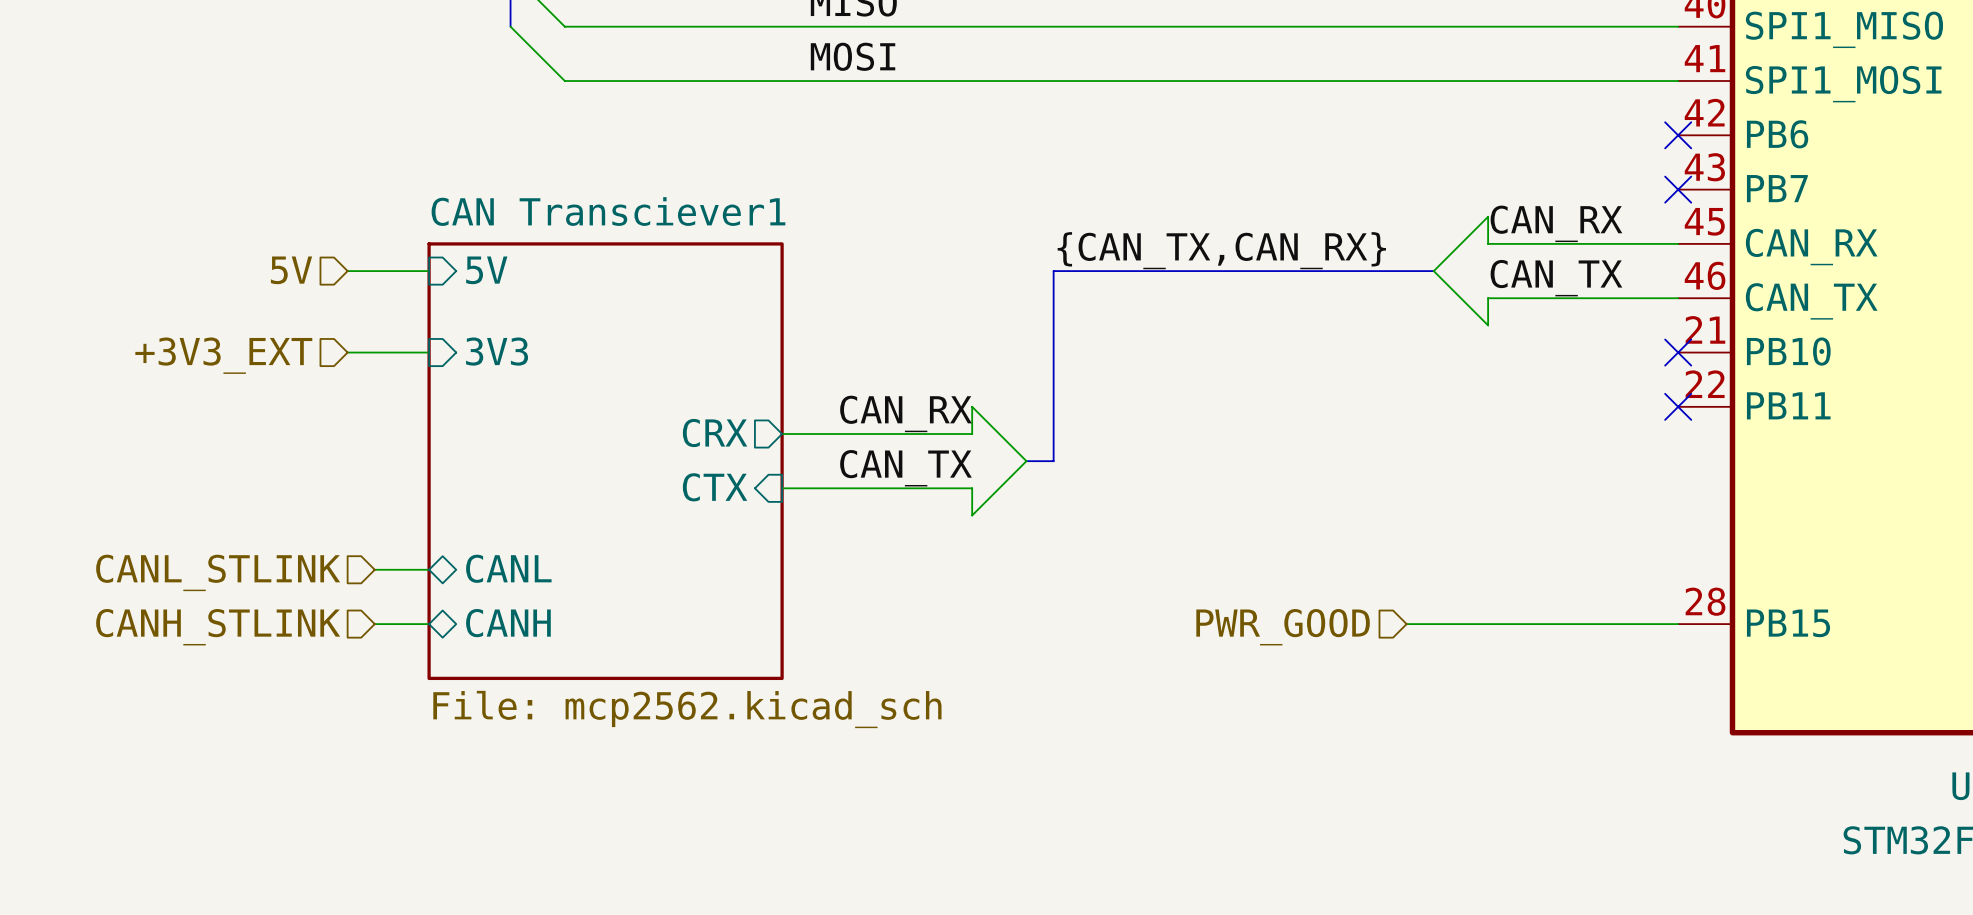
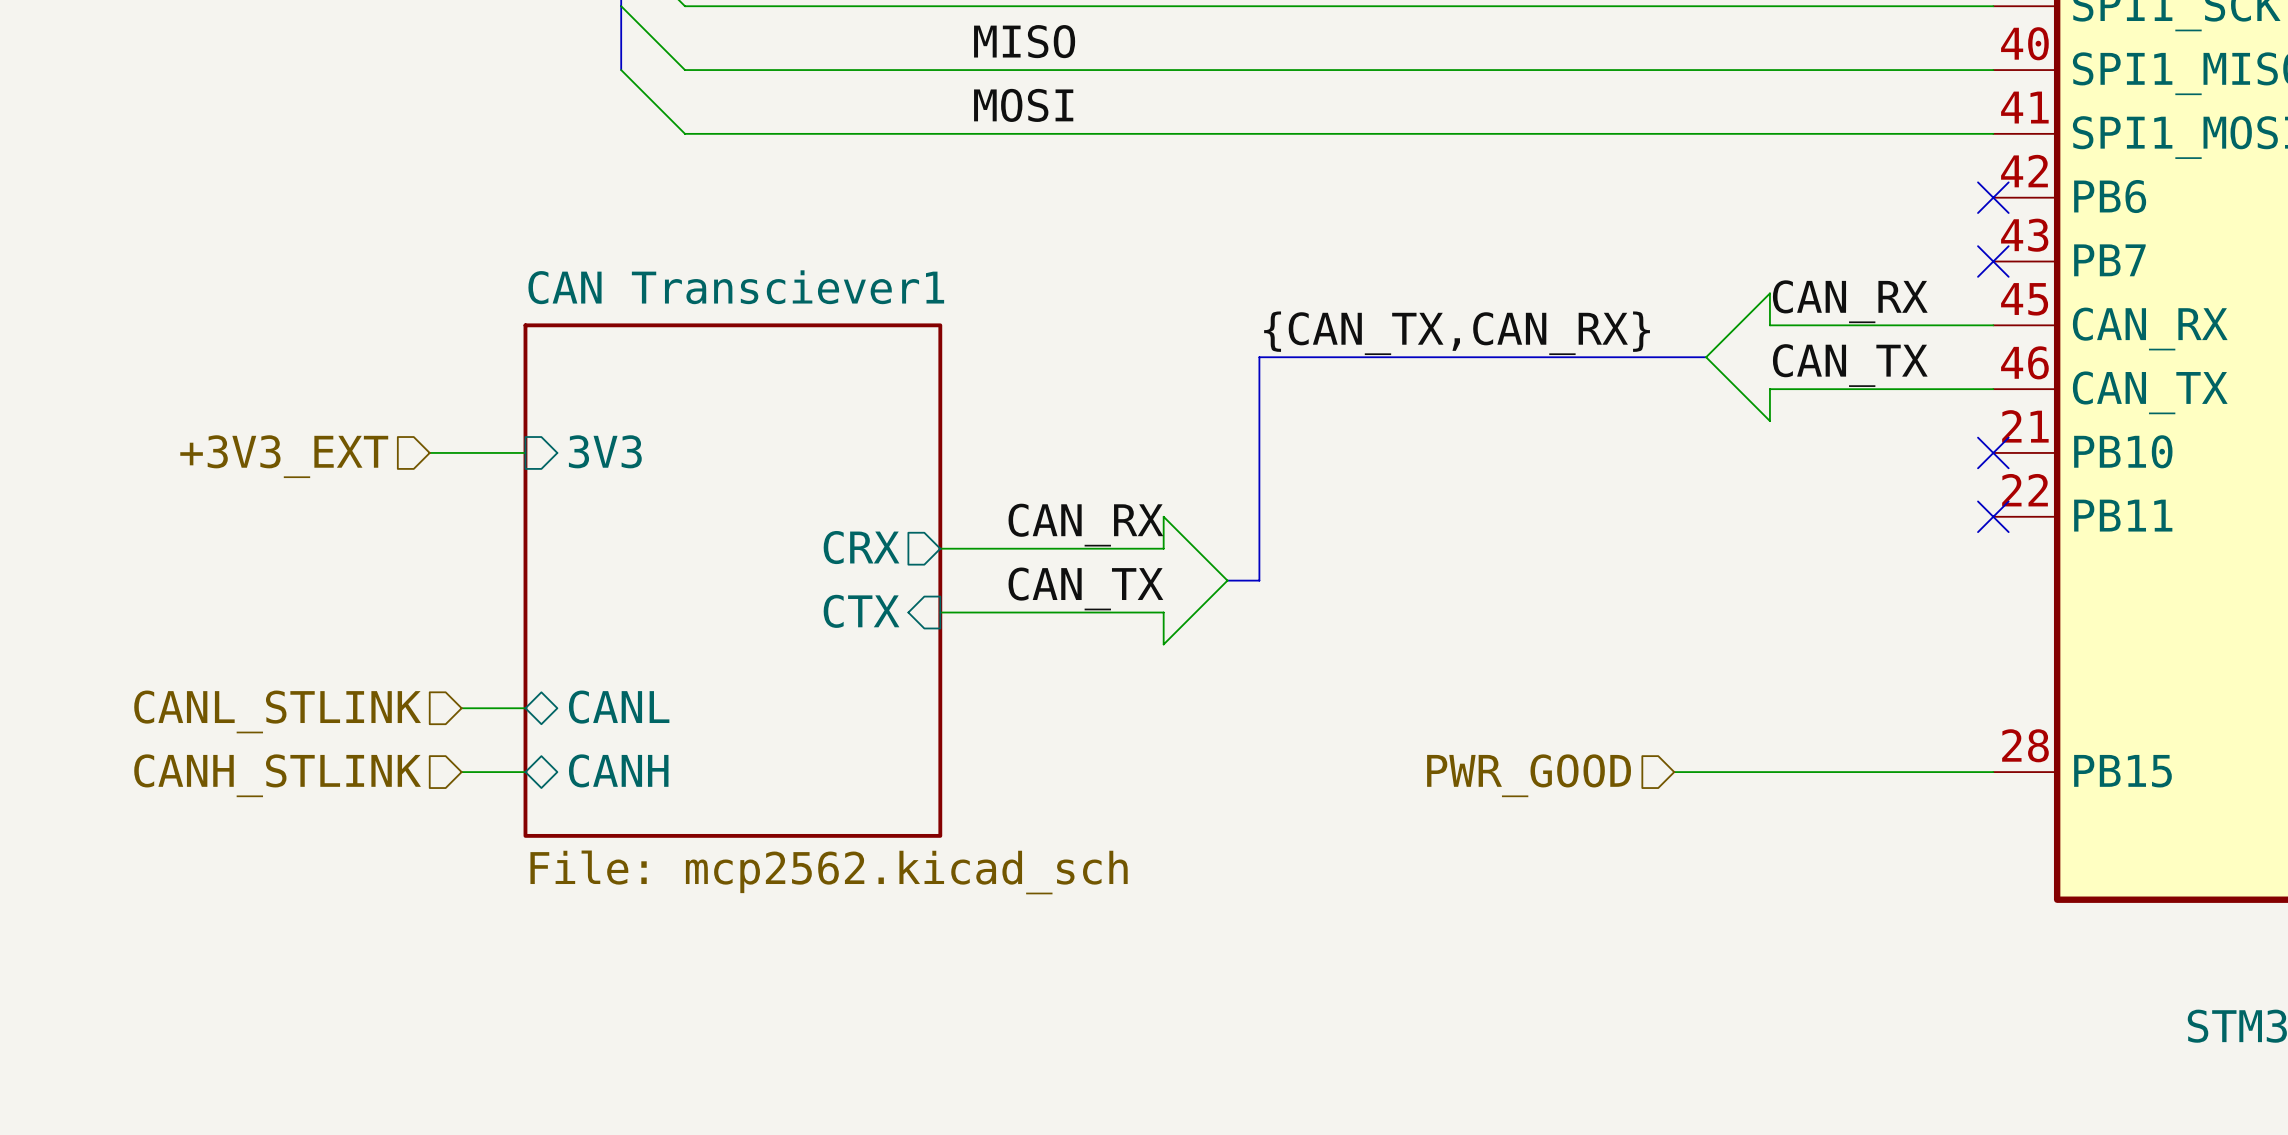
hierarchical label: 5V (291, 270) -> none
sheet pin: 5V (486, 270) -> none
wire: (347, 271) (429, 271) -> none

